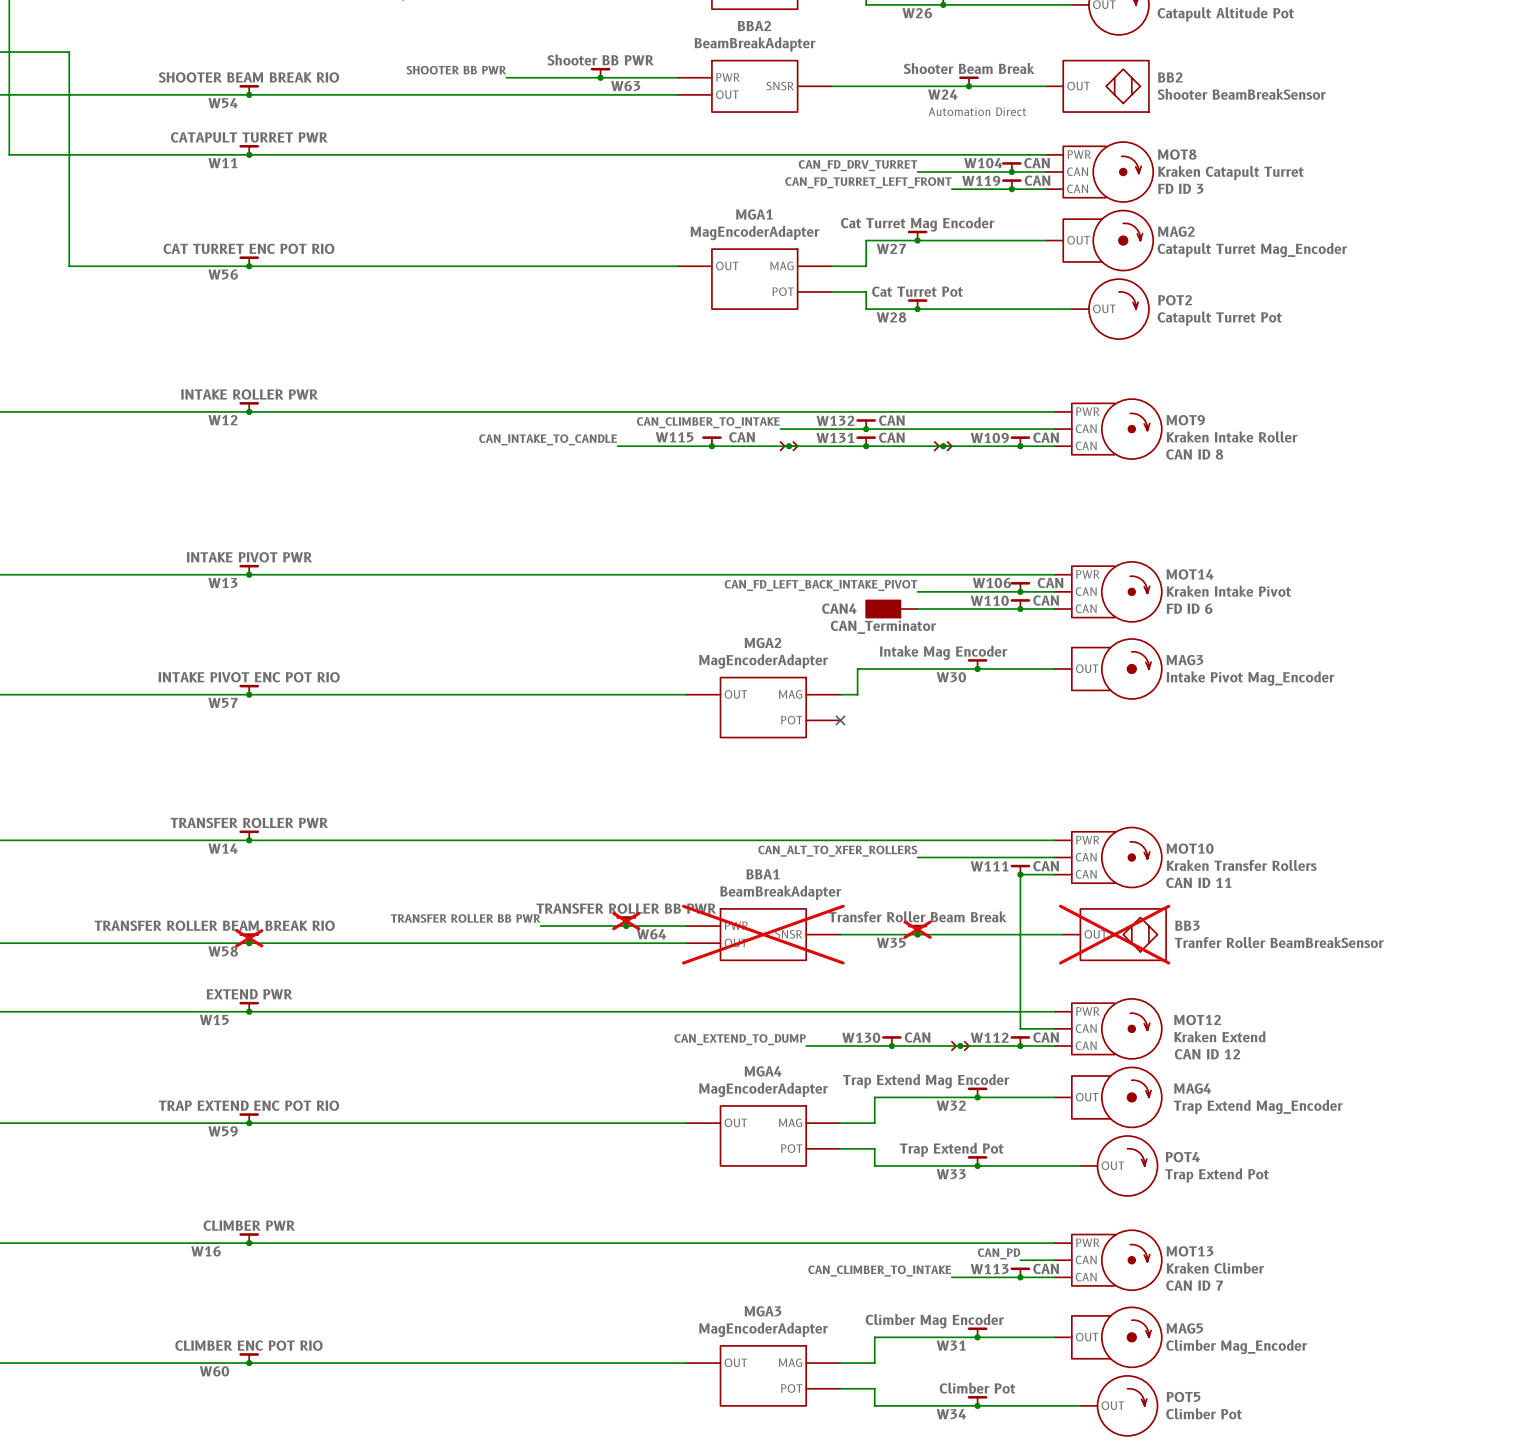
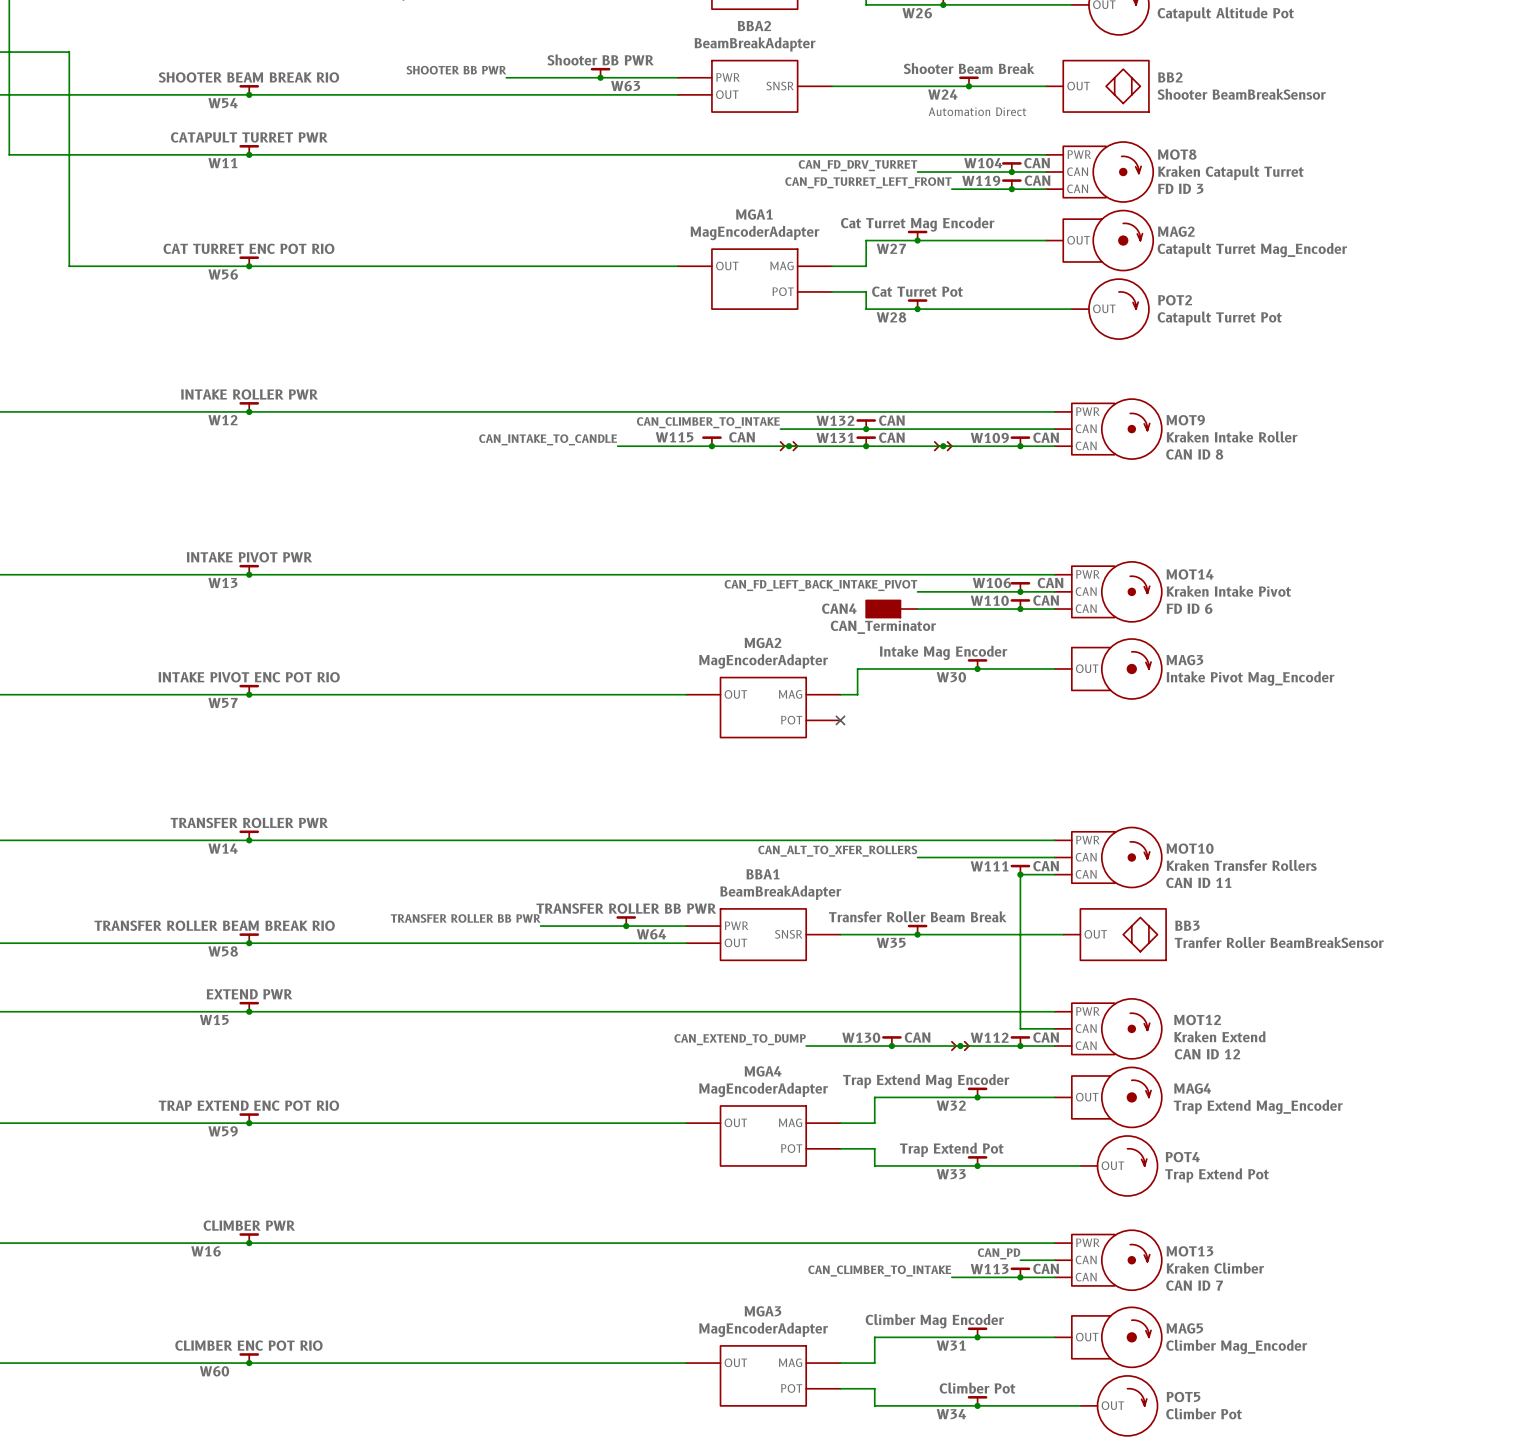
W64 do-not-place cross: (626, 921) -> none
W35 do-not-place cross: (917, 929) -> none
BBA1 do-not-place cross: (763, 934) -> none
BB3 do-not-place cross: (1114, 934) -> none
W58 do-not-place cross: (249, 938) -> none

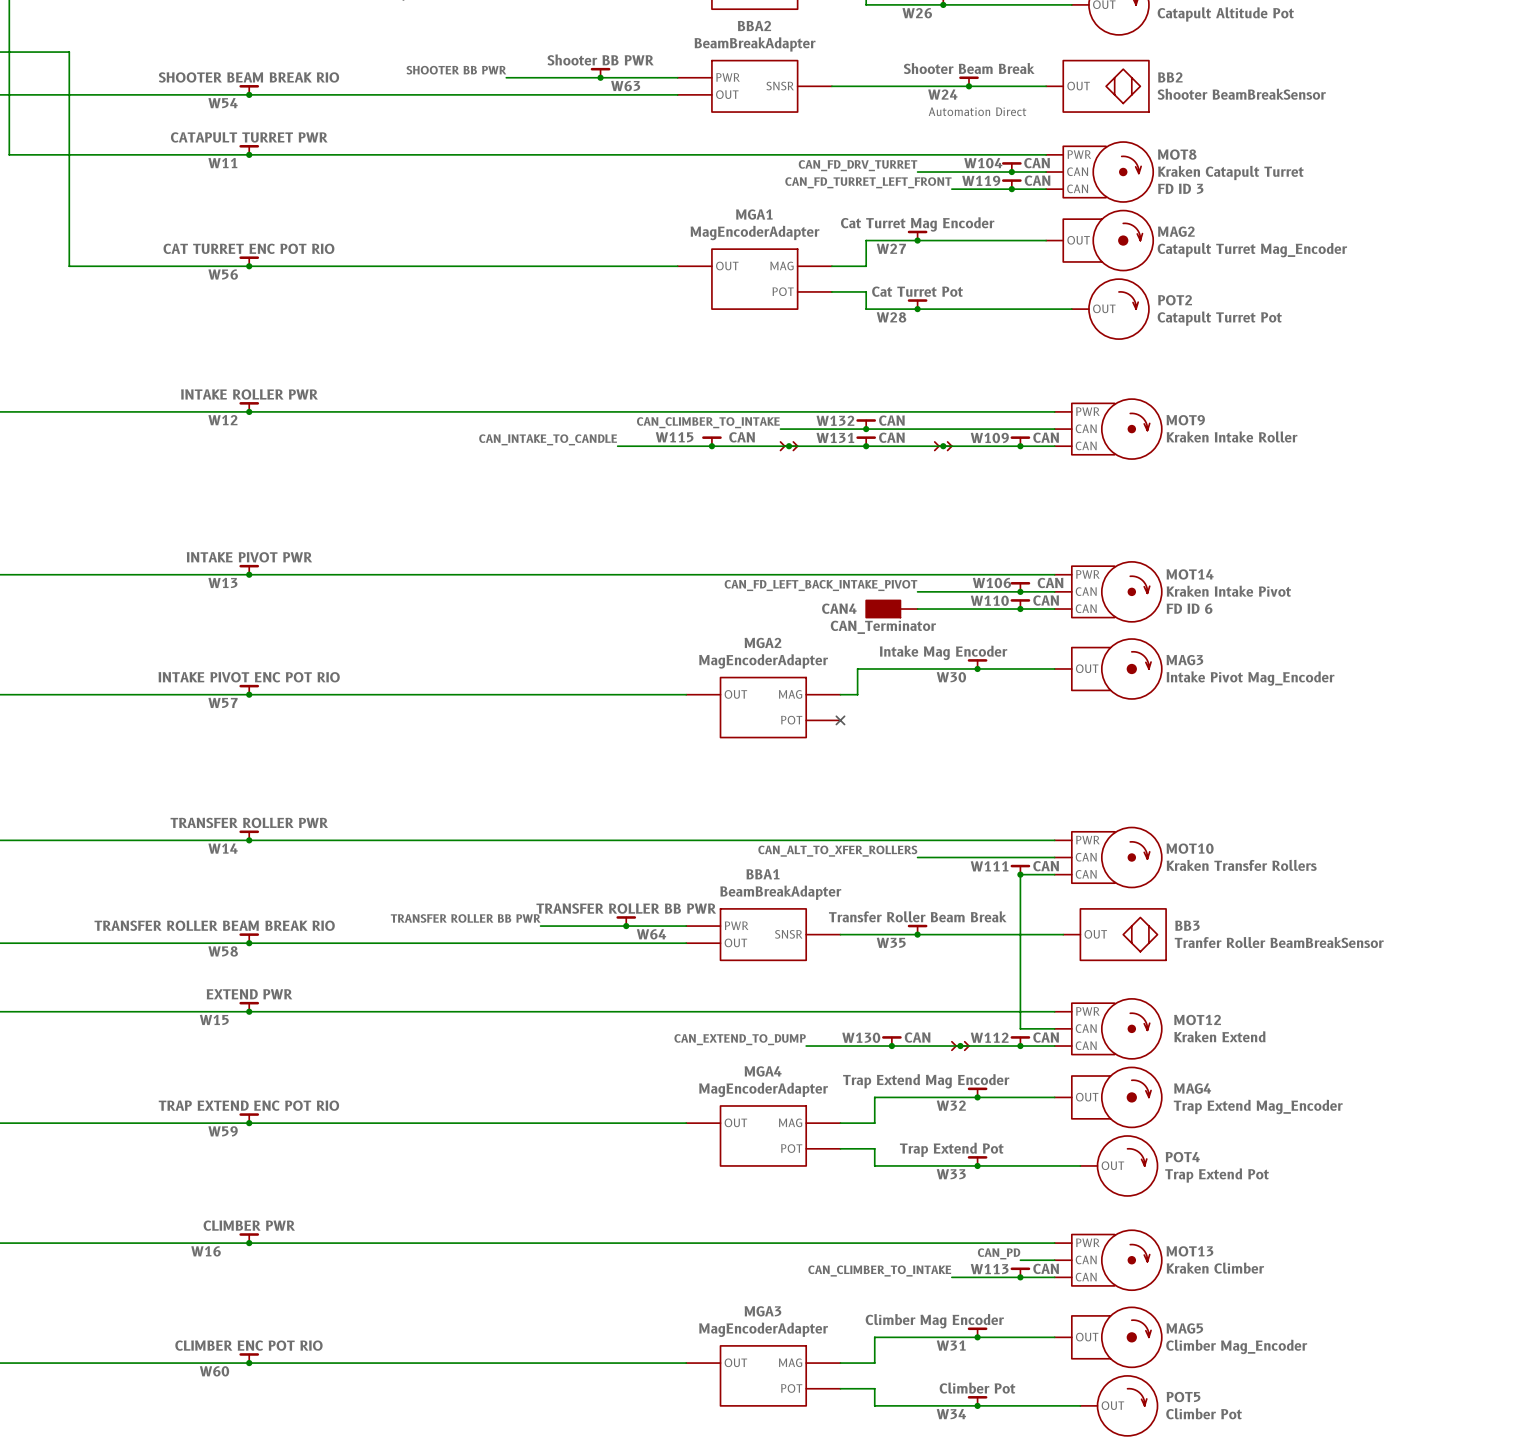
MOT9 text: CAN ID 8 (1194, 454) -> none
MOT10 text: CAN ID 11 (1198, 882) -> none
MOT12 text: CAN ID 12 (1207, 1054) -> none
MOT13 text: CAN ID 7 (1194, 1285) -> none

